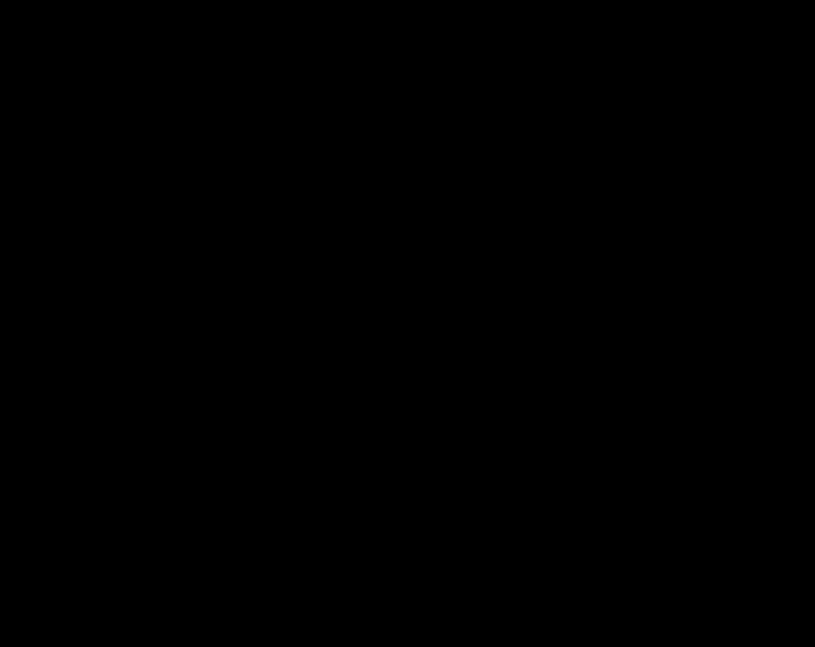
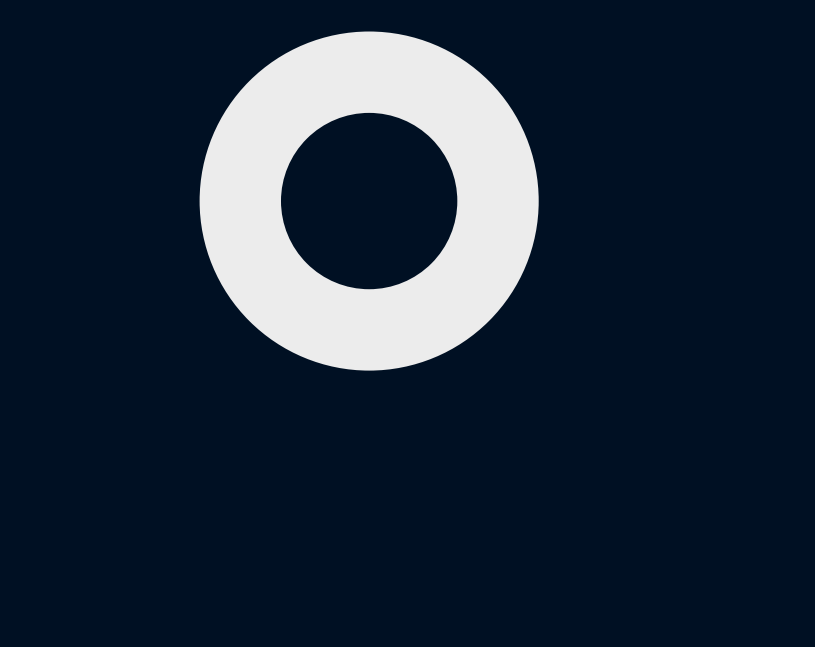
via: none -> (369, 201)

